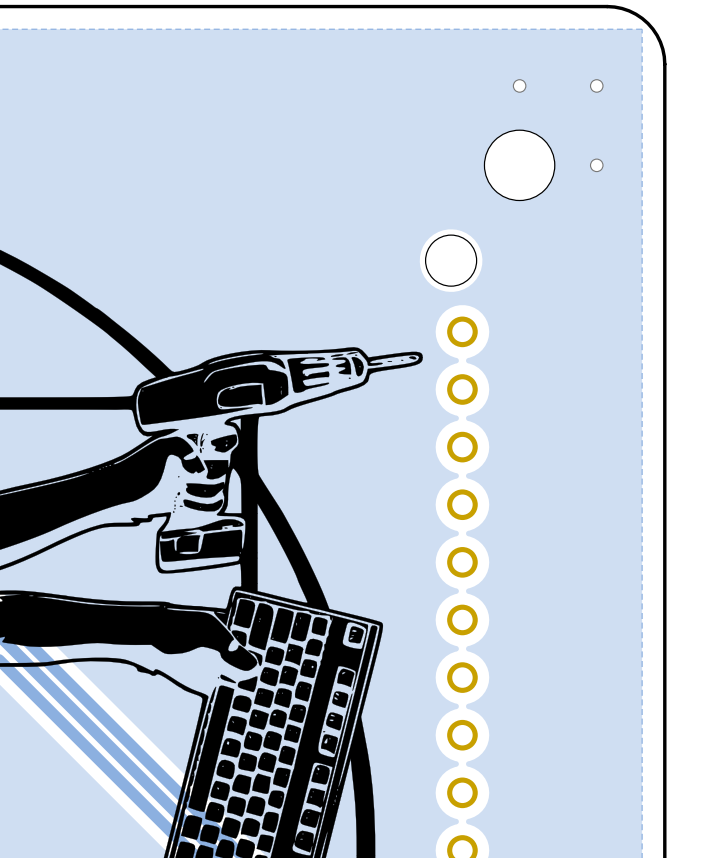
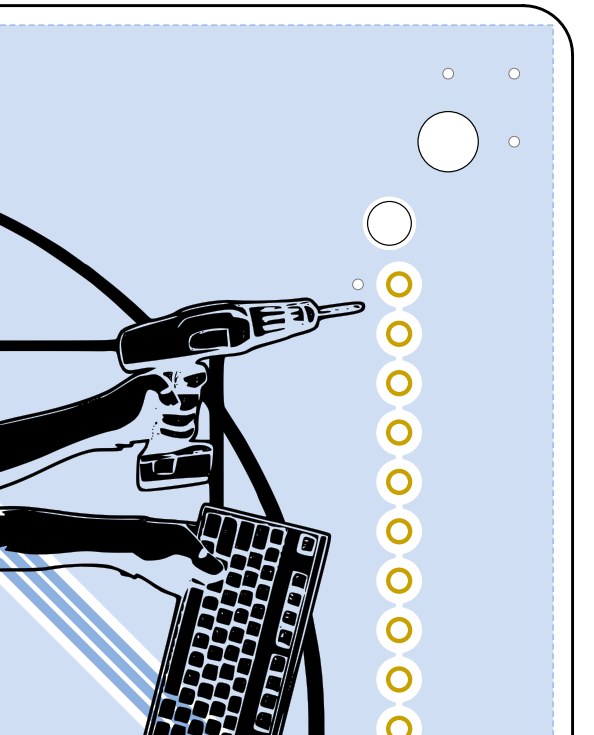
via: none -> (357, 284)

